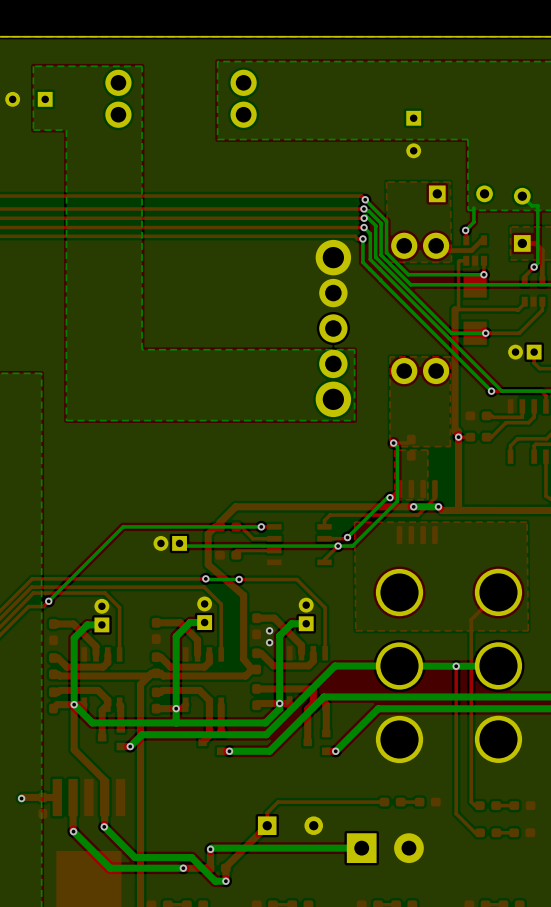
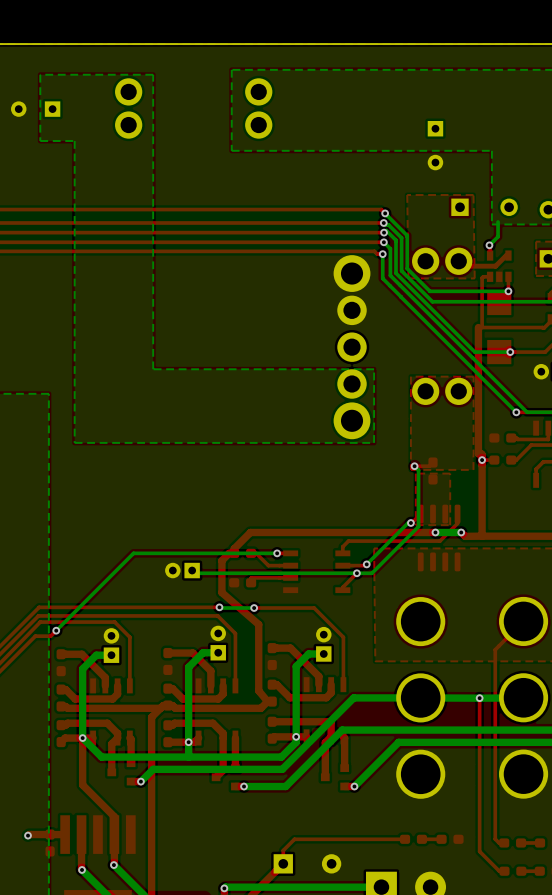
via: (269, 630) -> none
via: (269, 642) -> none

